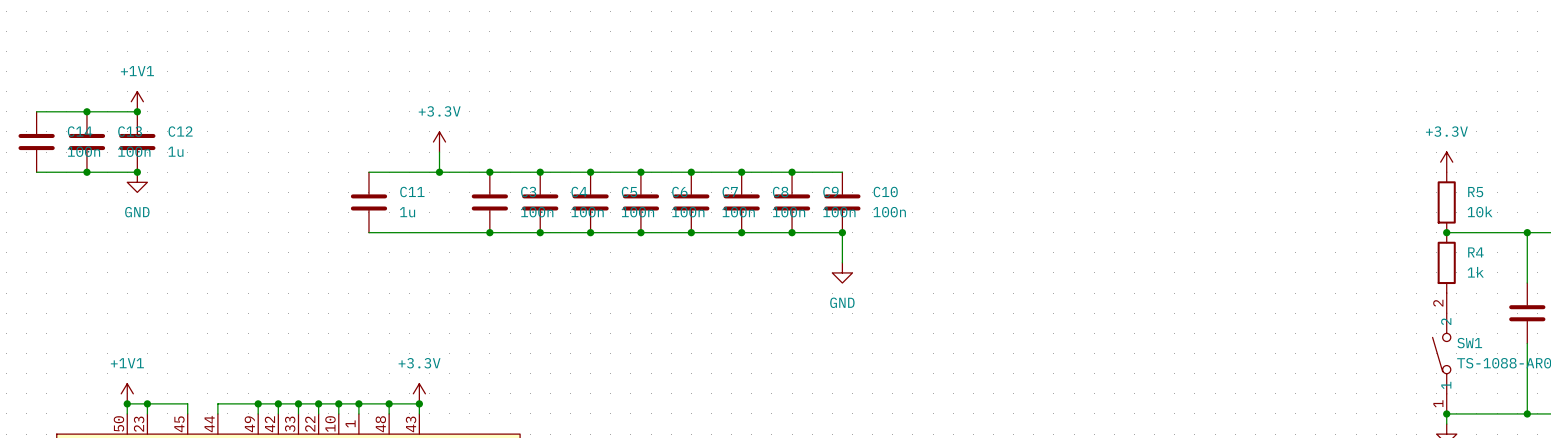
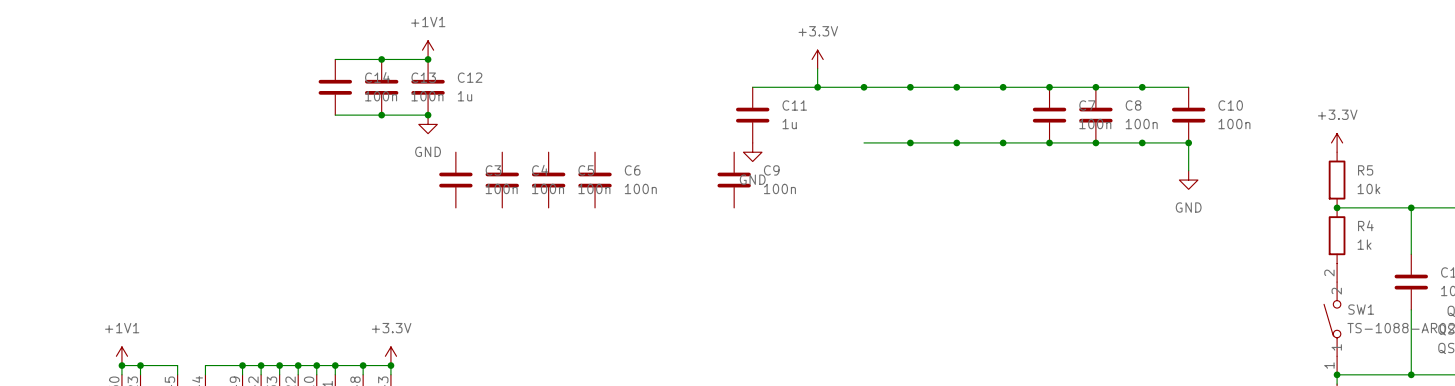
power symbol: none -> +1V1 (428, 50)
wire: none -> (335, 59) (428, 59)
junction: none -> (381, 59)
junction: none -> (428, 59)
power symbol: none -> +3.3V (817, 59)
wire: none -> (817, 68) (817, 87)
power symbol: +1V1 (137, 101) -> none
wire: none -> (752, 87) (1188, 87)
junction: none -> (817, 87)
junction: none -> (864, 87)
junction: none -> (910, 87)
junction: none -> (956, 87)
junction: none -> (1003, 87)
junction: none -> (1049, 87)
junction: none -> (1095, 87)
junction: none -> (1142, 87)
wire: (36, 111) (137, 111) -> none
junction: (86, 111) -> none
junction: (137, 111) -> none
wire: none -> (335, 115) (428, 115)
junction: none -> (381, 115)
junction: none -> (428, 115)
C14 position: (36, 142) -> (335, 87)
C13 position: (86, 142) -> (381, 87)
C12 position: (137, 142) -> (428, 87)
power symbol: +3.3V (439, 142) -> none
power symbol: none -> GND (428, 124)
wire: (439, 152) (439, 172) -> none
wire: none -> (864, 142) (1188, 142) (1188, 170)
junction: none -> (910, 142)
junction: none -> (956, 142)
junction: none -> (1003, 142)
junction: none -> (1049, 142)
junction: none -> (1095, 142)
junction: none -> (1142, 142)
junction: none -> (1188, 142)
wire: (36, 172) (137, 172) -> none
junction: (86, 172) -> none
junction: (137, 172) -> none
wire: (368, 172) (842, 172) -> none
junction: (439, 172) -> none
junction: (489, 172) -> none
junction: (540, 172) -> none
junction: (590, 172) -> none
junction: (640, 172) -> none
junction: (691, 172) -> none
junction: (741, 172) -> none
junction: (792, 172) -> none
power symbol: GND (137, 182) -> none
C11 position: (368, 202) -> (752, 115)
C7 position: (691, 202) -> (1049, 115)
C8 position: (741, 202) -> (1095, 115)
C10 position: (842, 202) -> (1188, 115)
power symbol: none -> GND (1188, 180)
wire: (368, 232) (842, 232) (842, 262) -> none
junction: (489, 232) -> none
junction: (540, 232) -> none
junction: (590, 232) -> none
junction: (640, 232) -> none
junction: (691, 232) -> none
junction: (741, 232) -> none
junction: (792, 232) -> none
junction: (842, 232) -> none
power symbol position: GND (842, 272) -> GND (752, 152)

